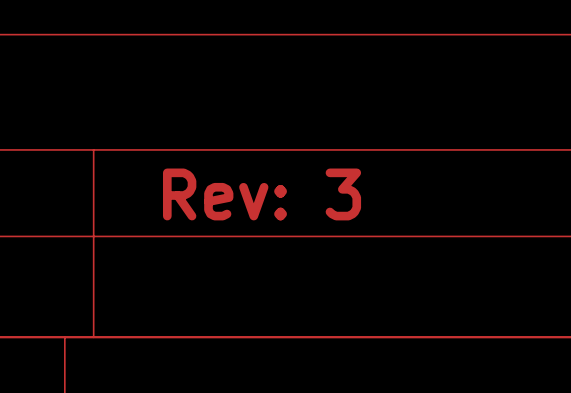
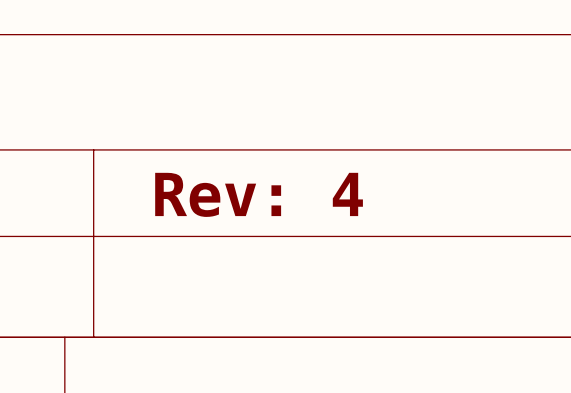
title block: Rev: 3 (262, 194) -> Rev: 4 (259, 194)

